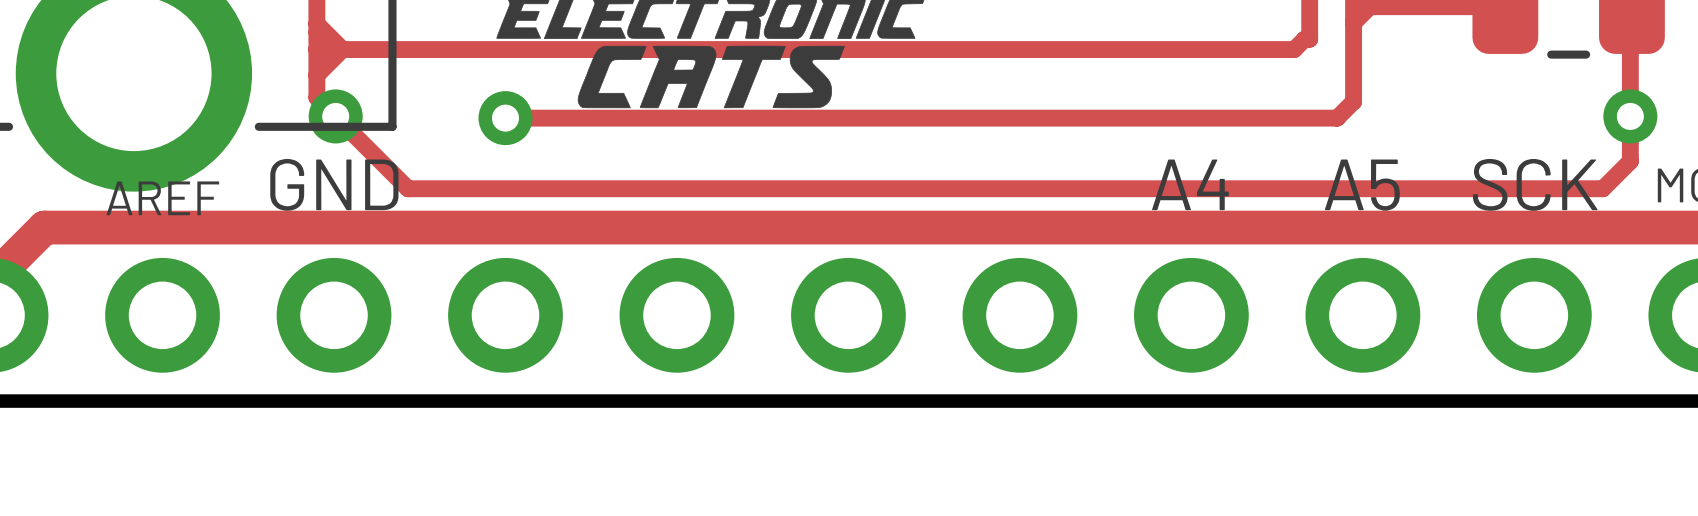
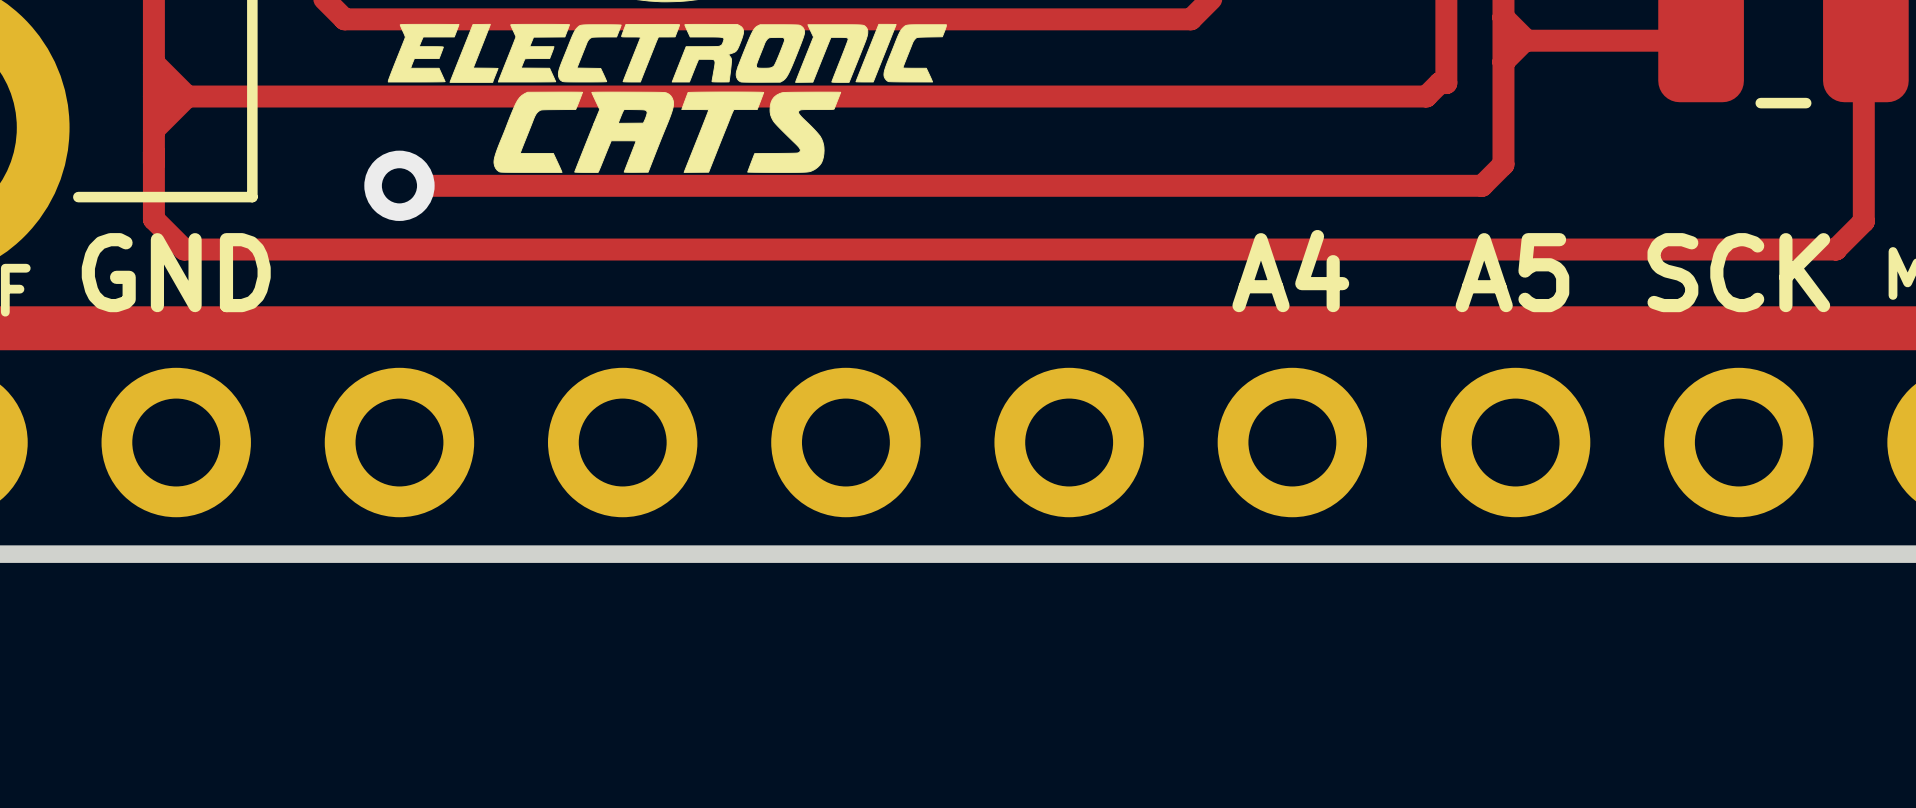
track: (316, 97) (408, 188) (1602, 188) (1630, 161) (1630, 145) -> (153, 159) (153, 219) (184, 249) (1836, 249) (1863, 221)
via: (335, 116) -> none
via: (1630, 116) -> none

